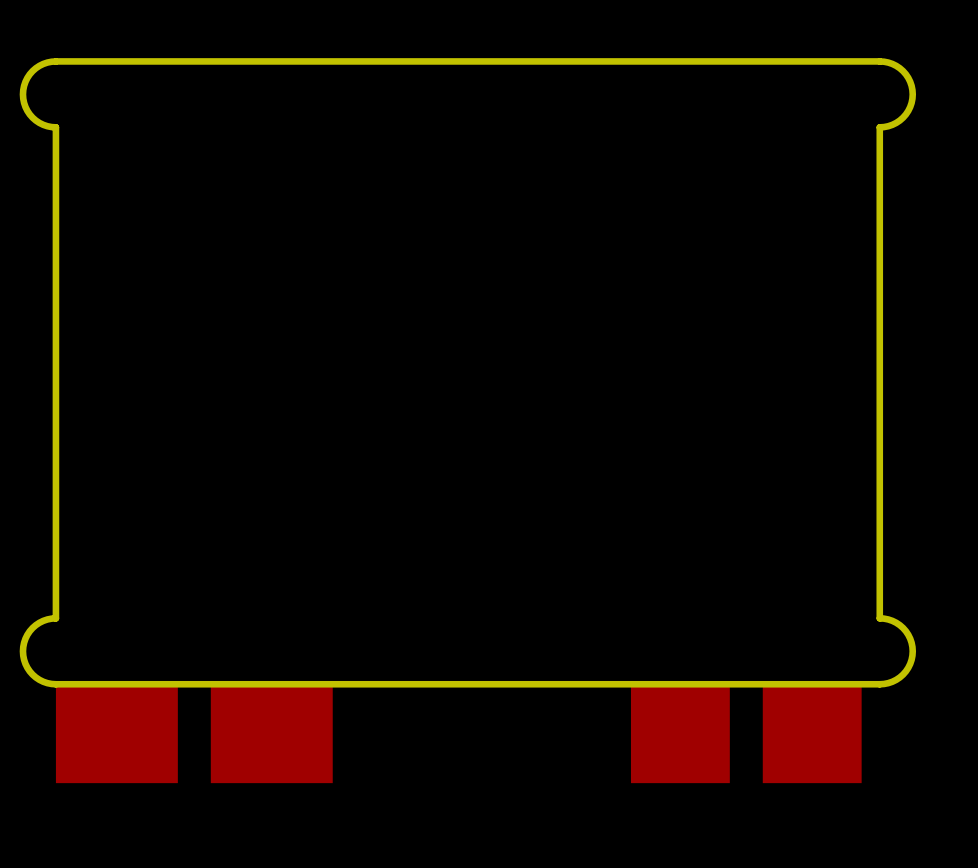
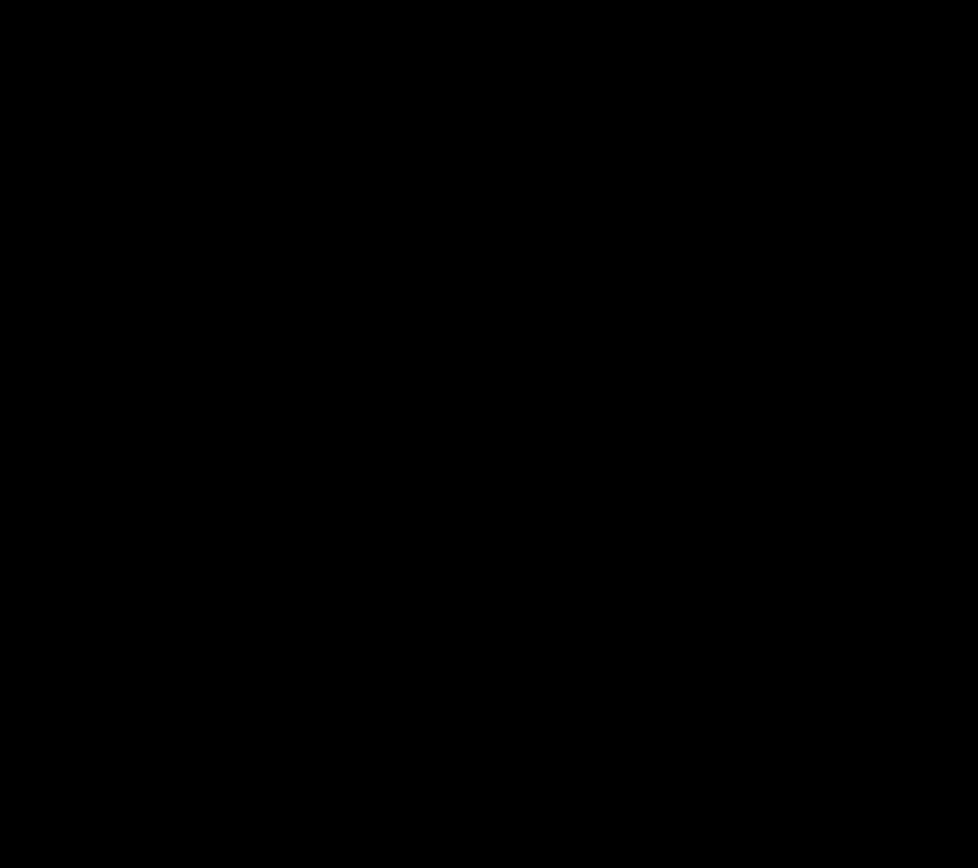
part: (467, 420) -> none

